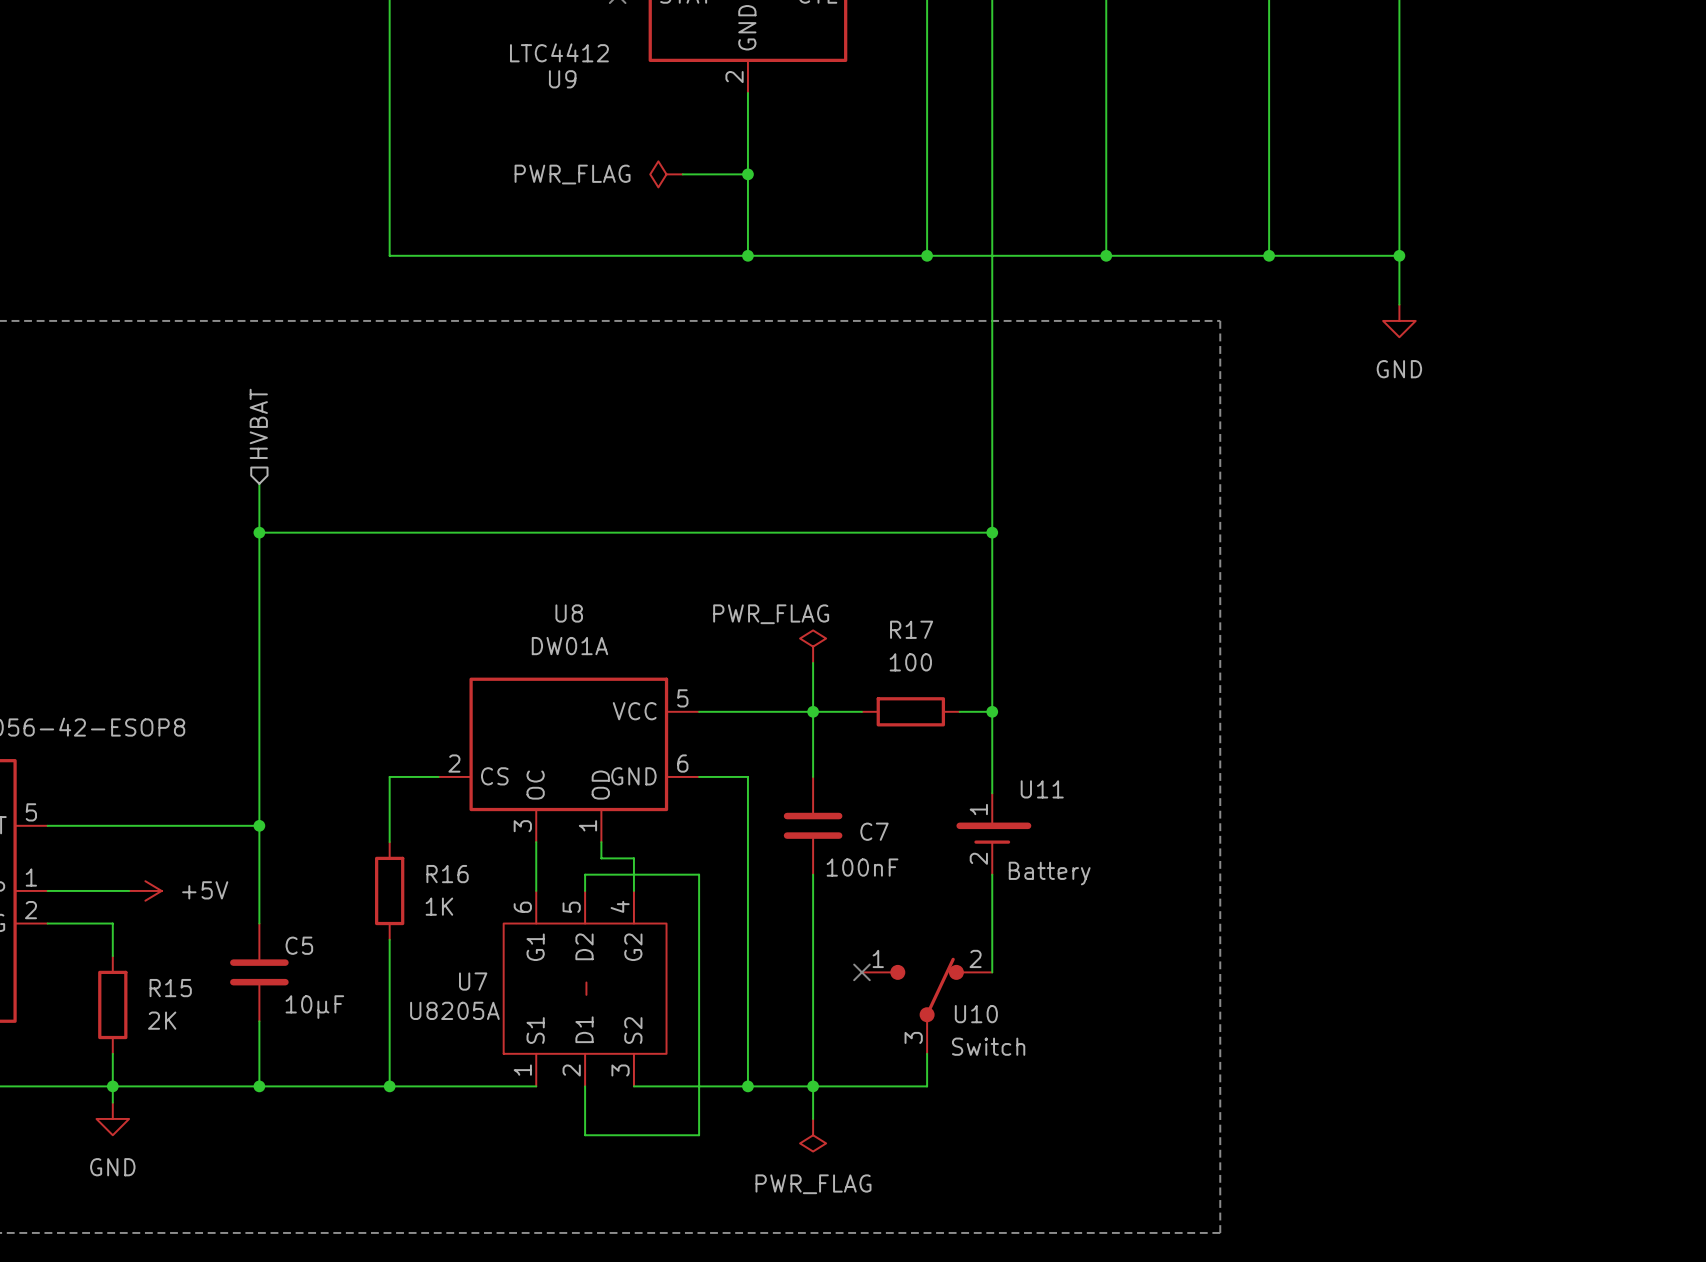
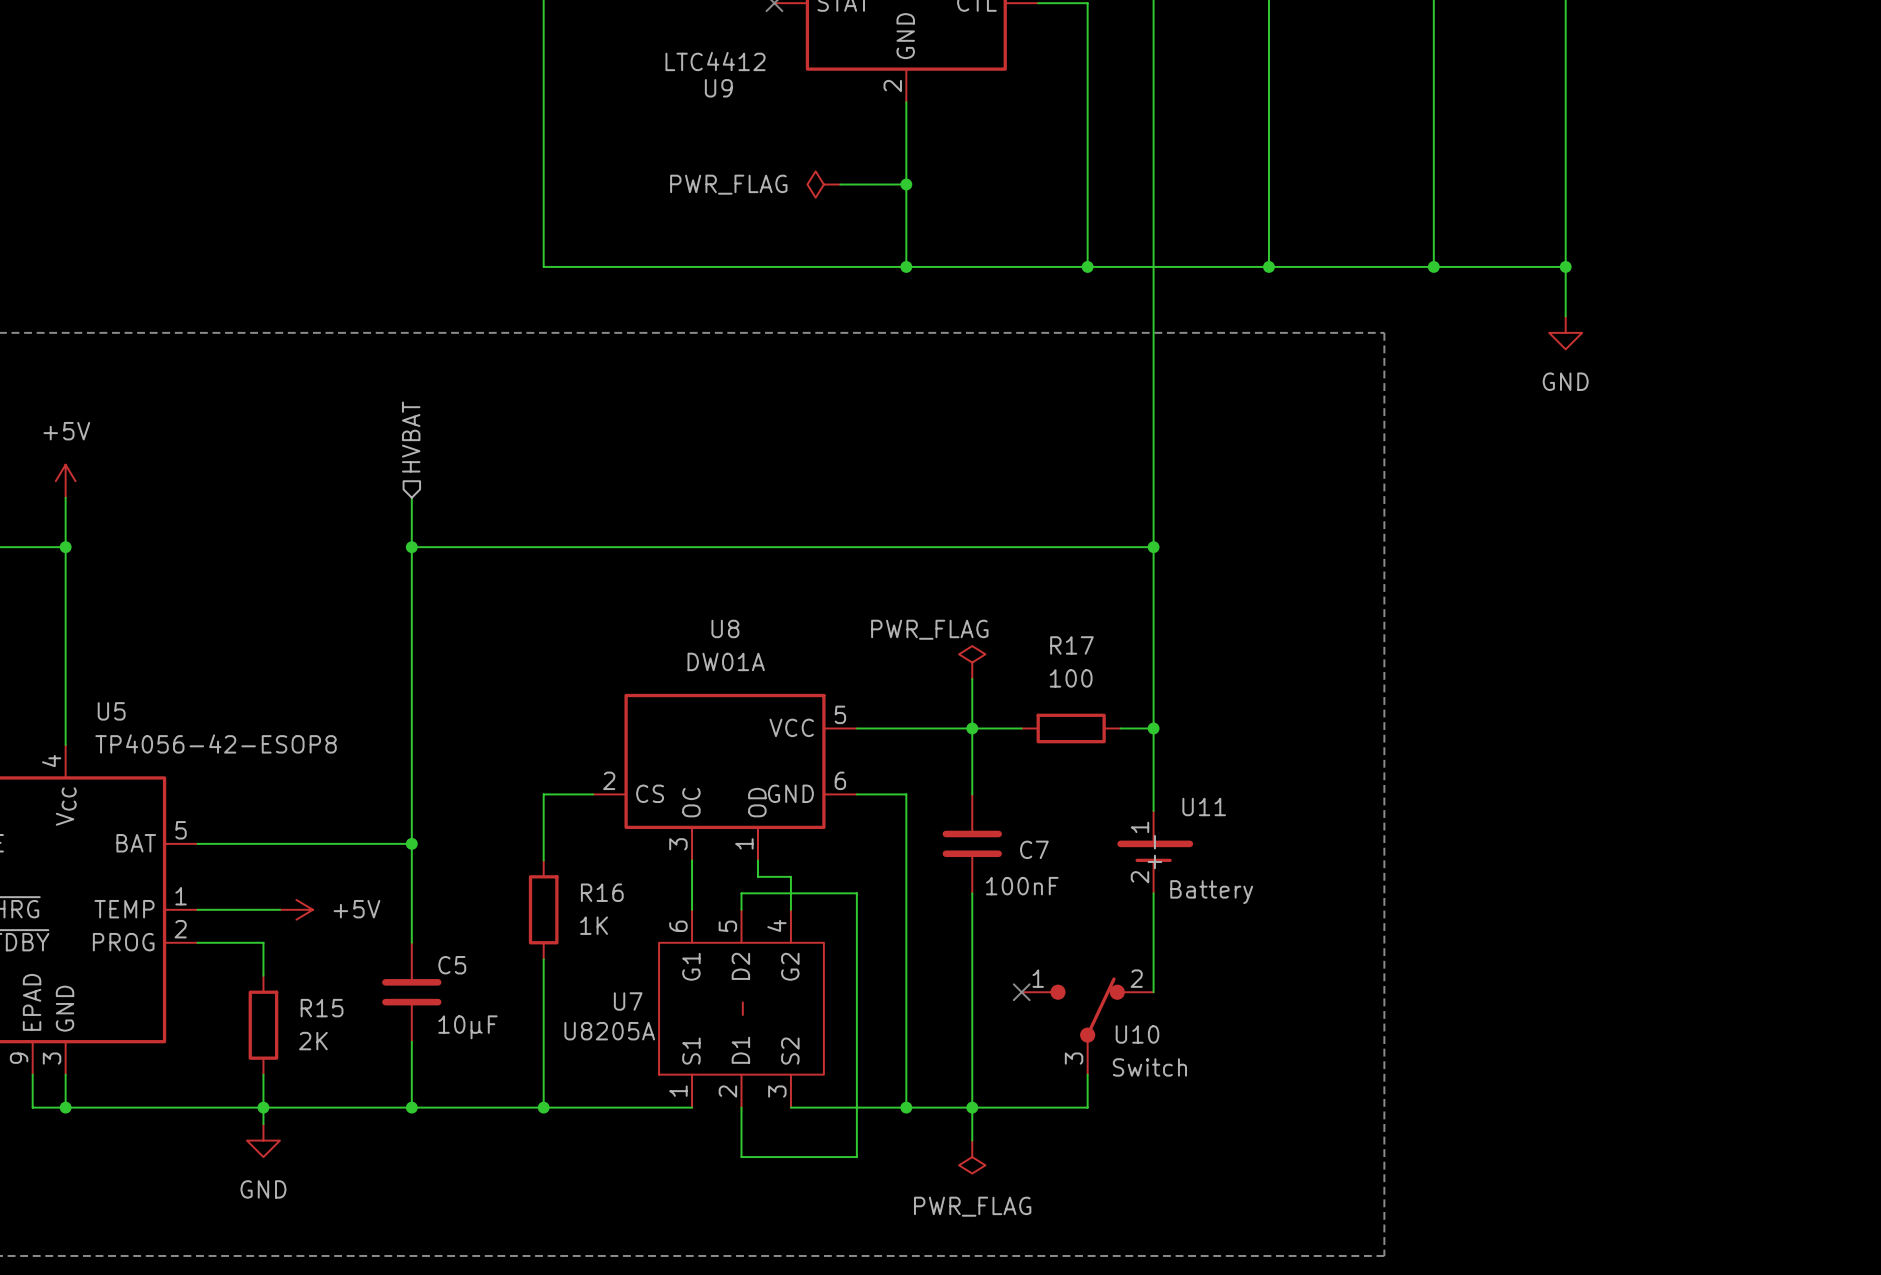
U11 pin name: none -> - (1154, 842)
U11 pin name: none -> + (1154, 861)

